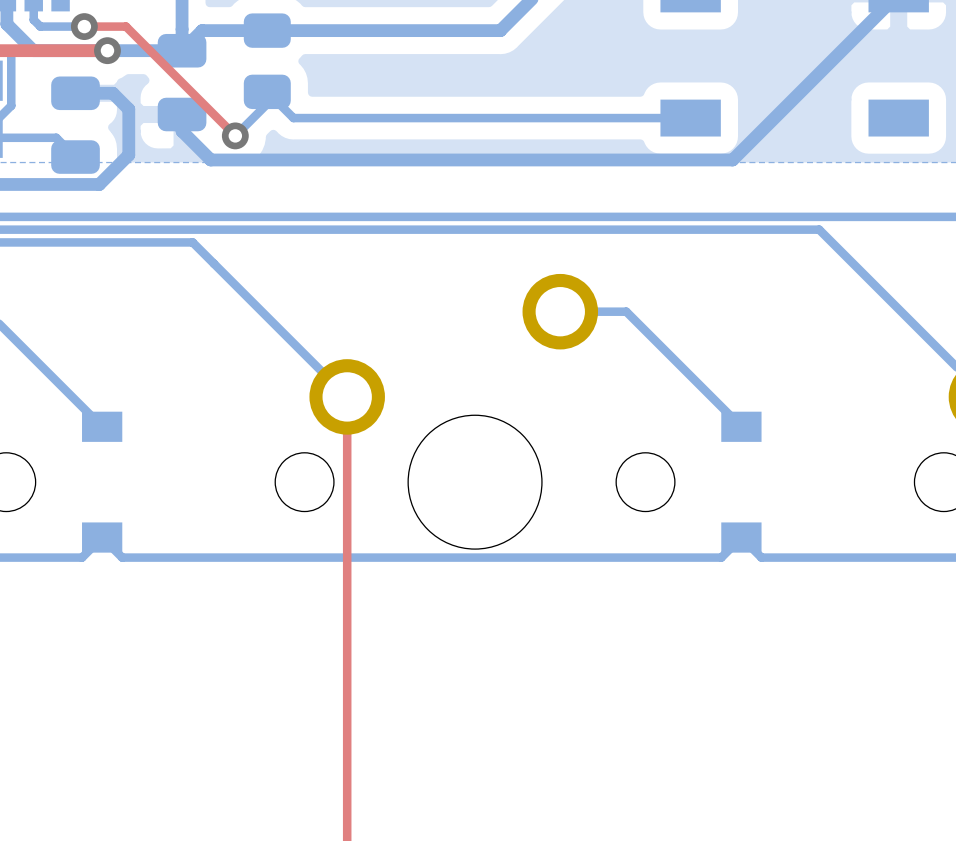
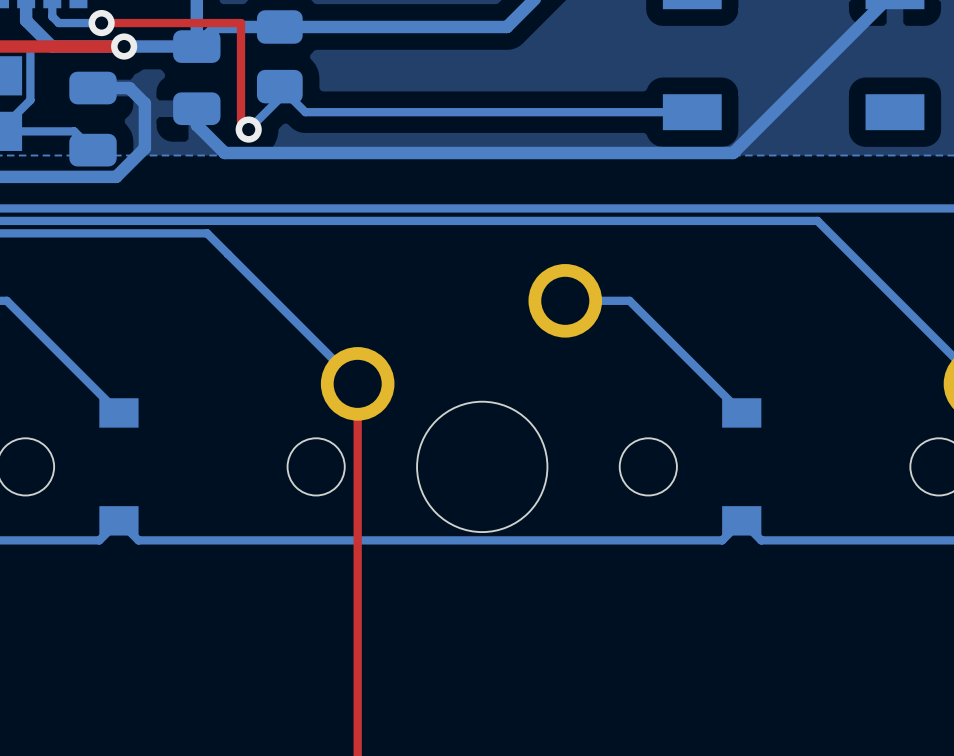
top track: (126, 26) (227, 128) -> (142, 23) (241, 23) (241, 121)

